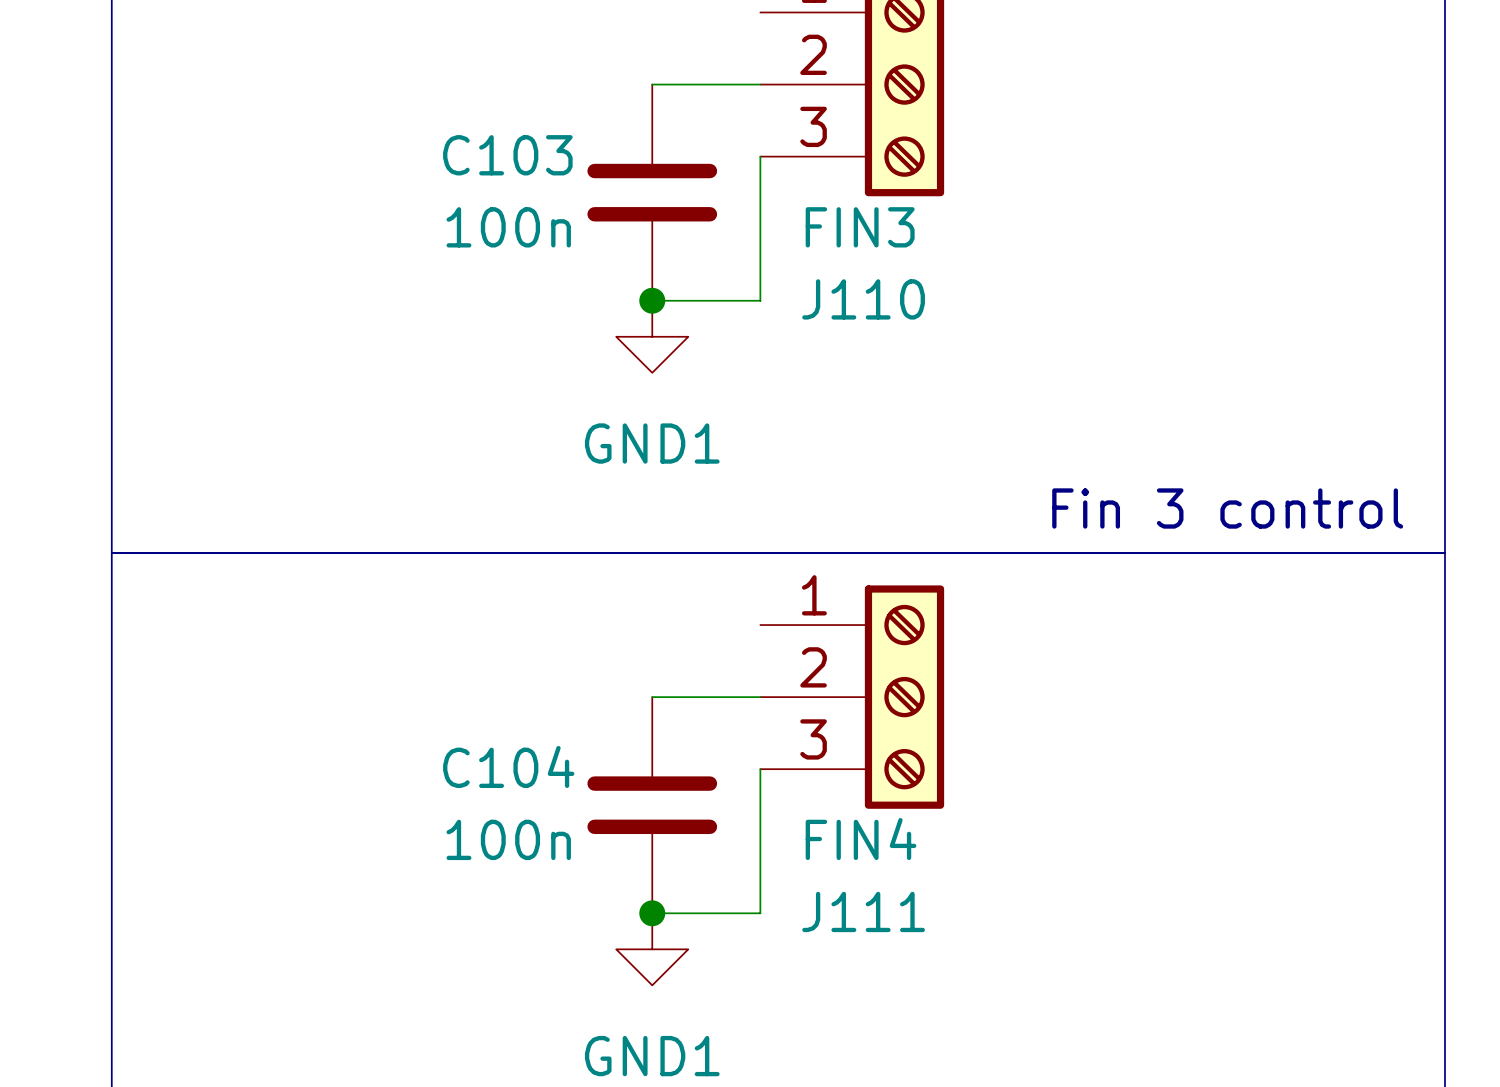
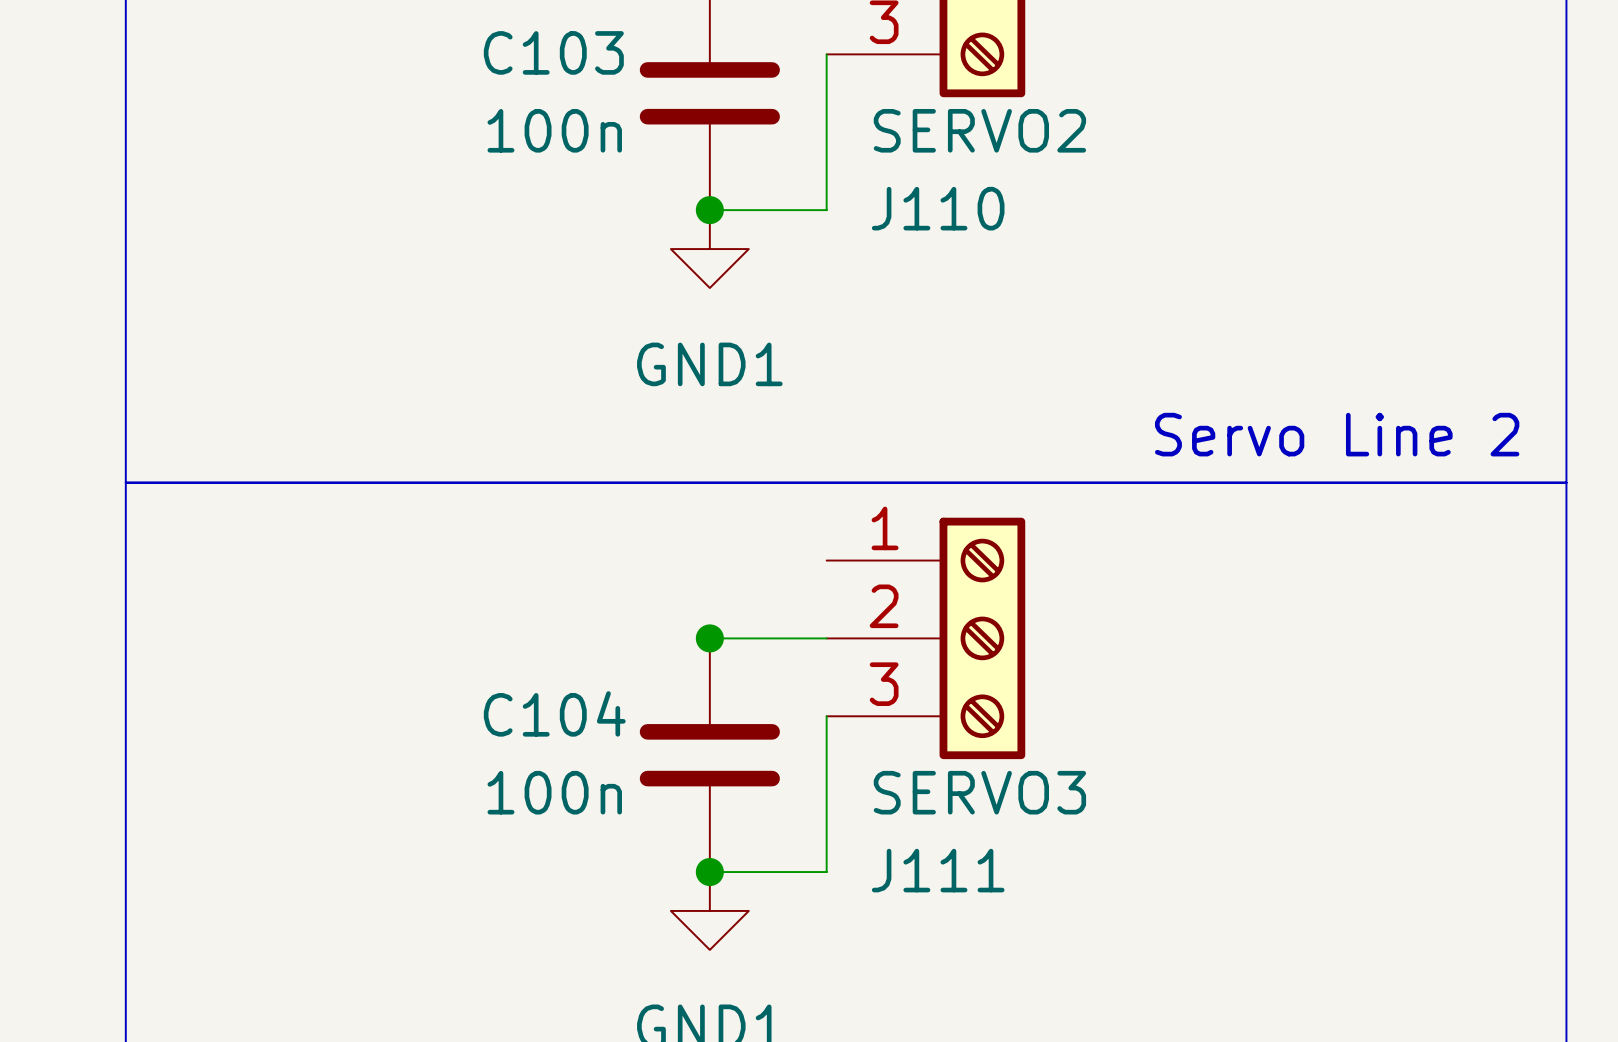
J110 value: FIN3 (860, 227) -> SERVO2 (979, 130)
text: Fin 3 control (1227, 508) -> Servo Line 2 (1337, 434)
junction: none -> (709, 638)
J111 value: FIN4 (861, 839) -> SERVO3 (979, 792)

